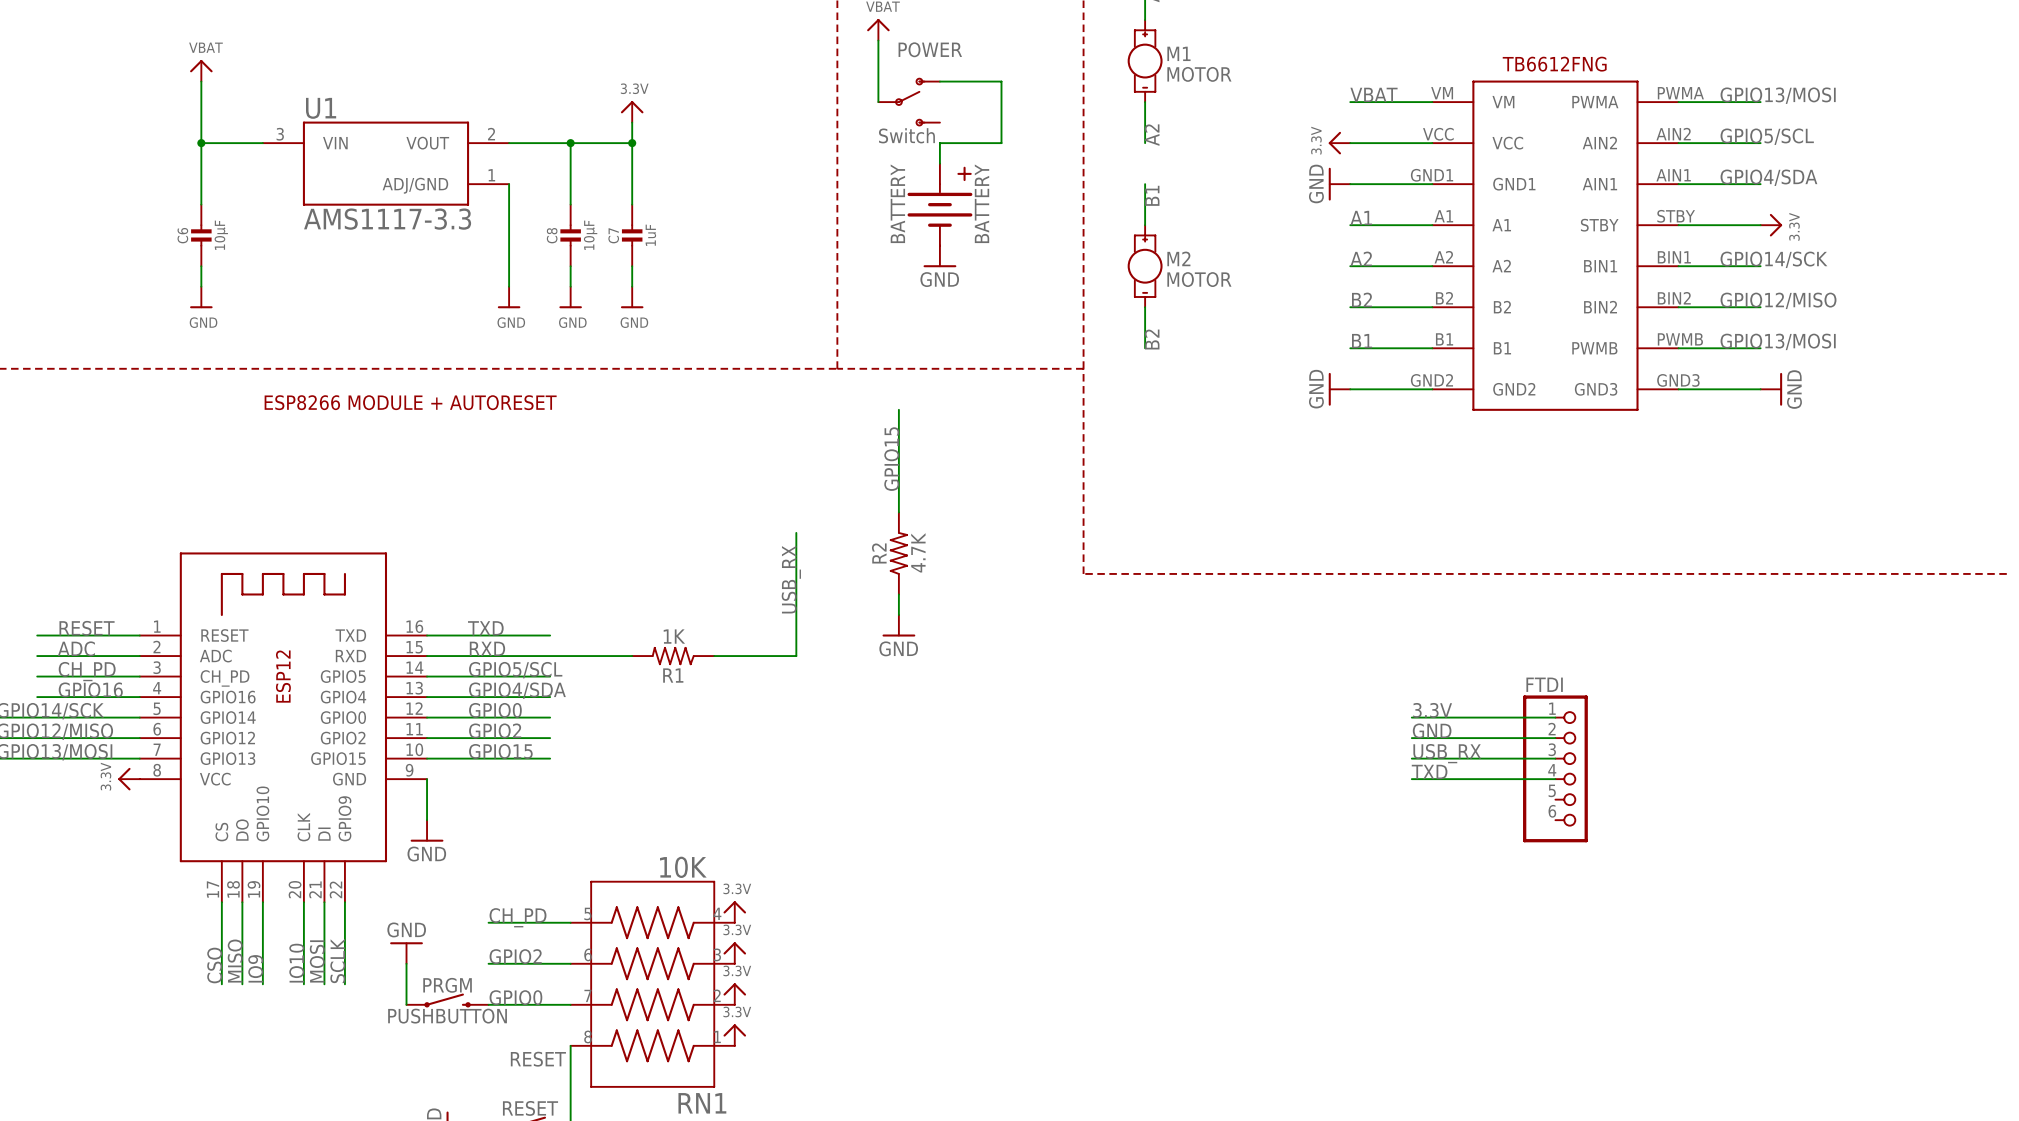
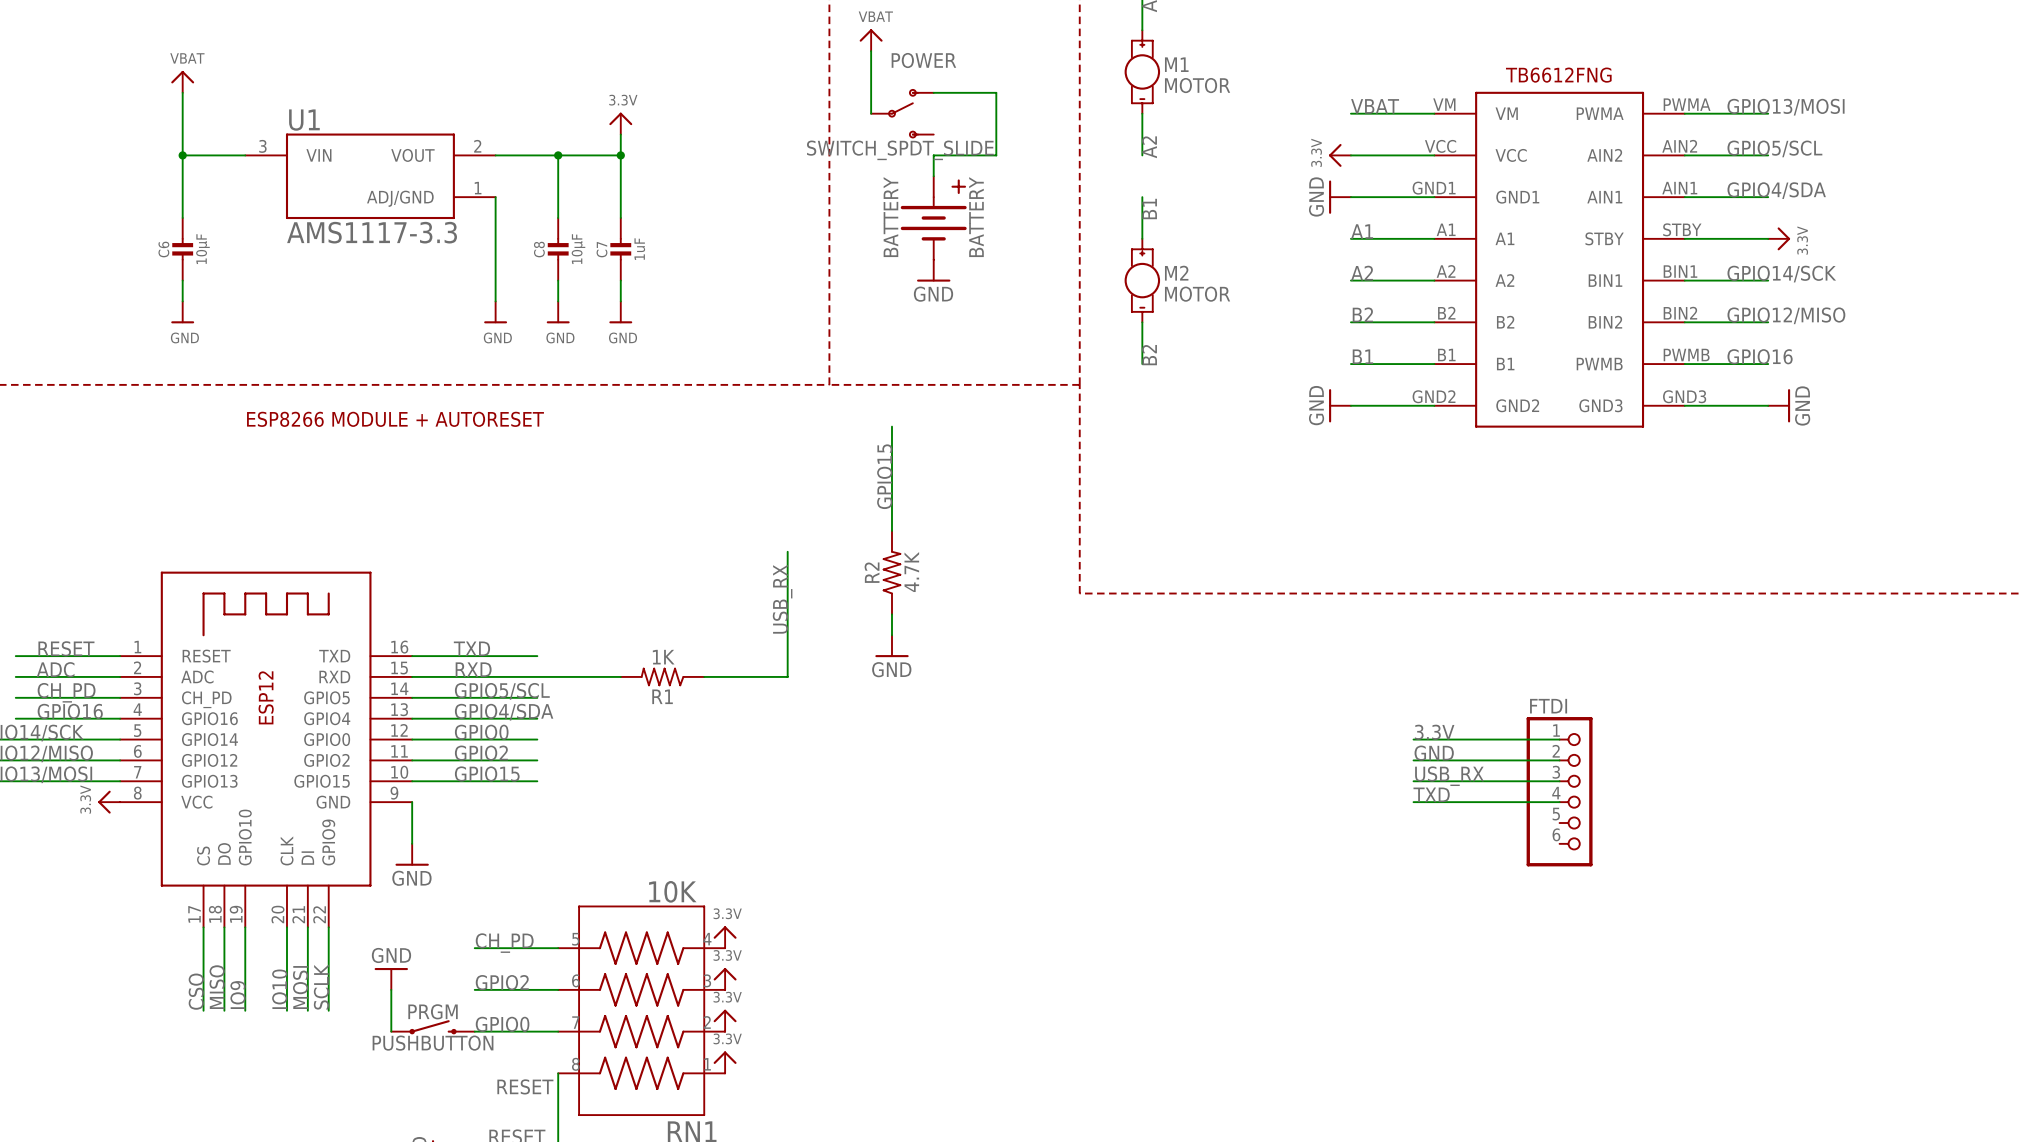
POWER value: Switch (906, 135) -> SWITCH_SPDT_SLIDE (900, 150)
label: GPIO13/MOSI (1778, 341) -> GPIO16 (1760, 356)

